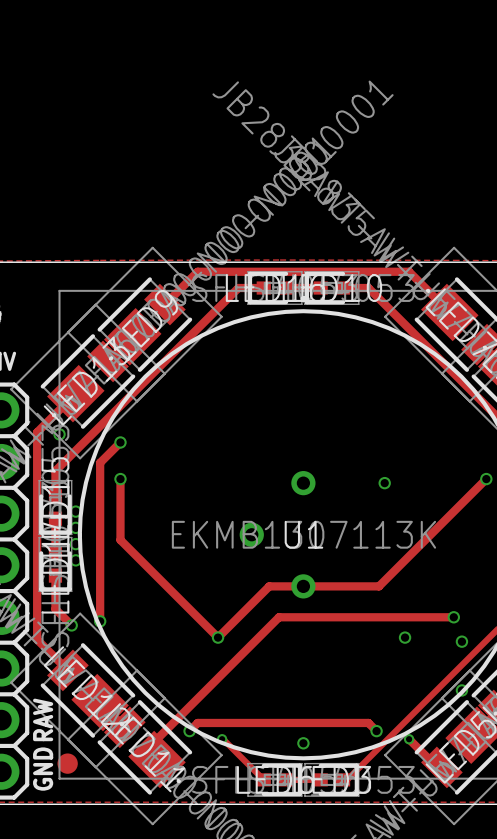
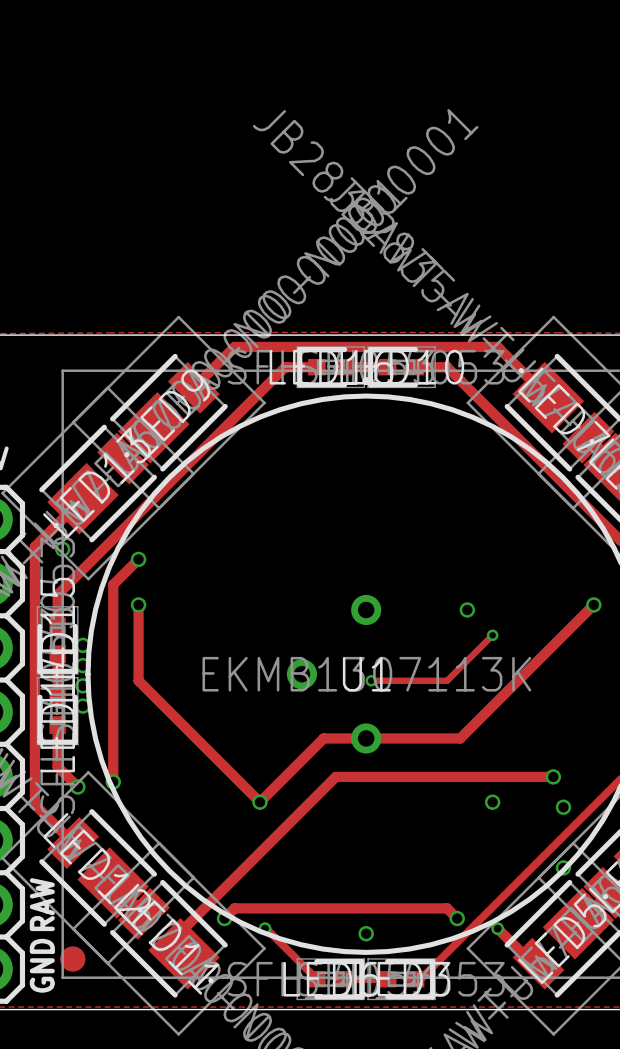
track: none -> (492, 635) (447, 680) (371, 680)
via: none -> (492, 635)
via: none -> (371, 680)

